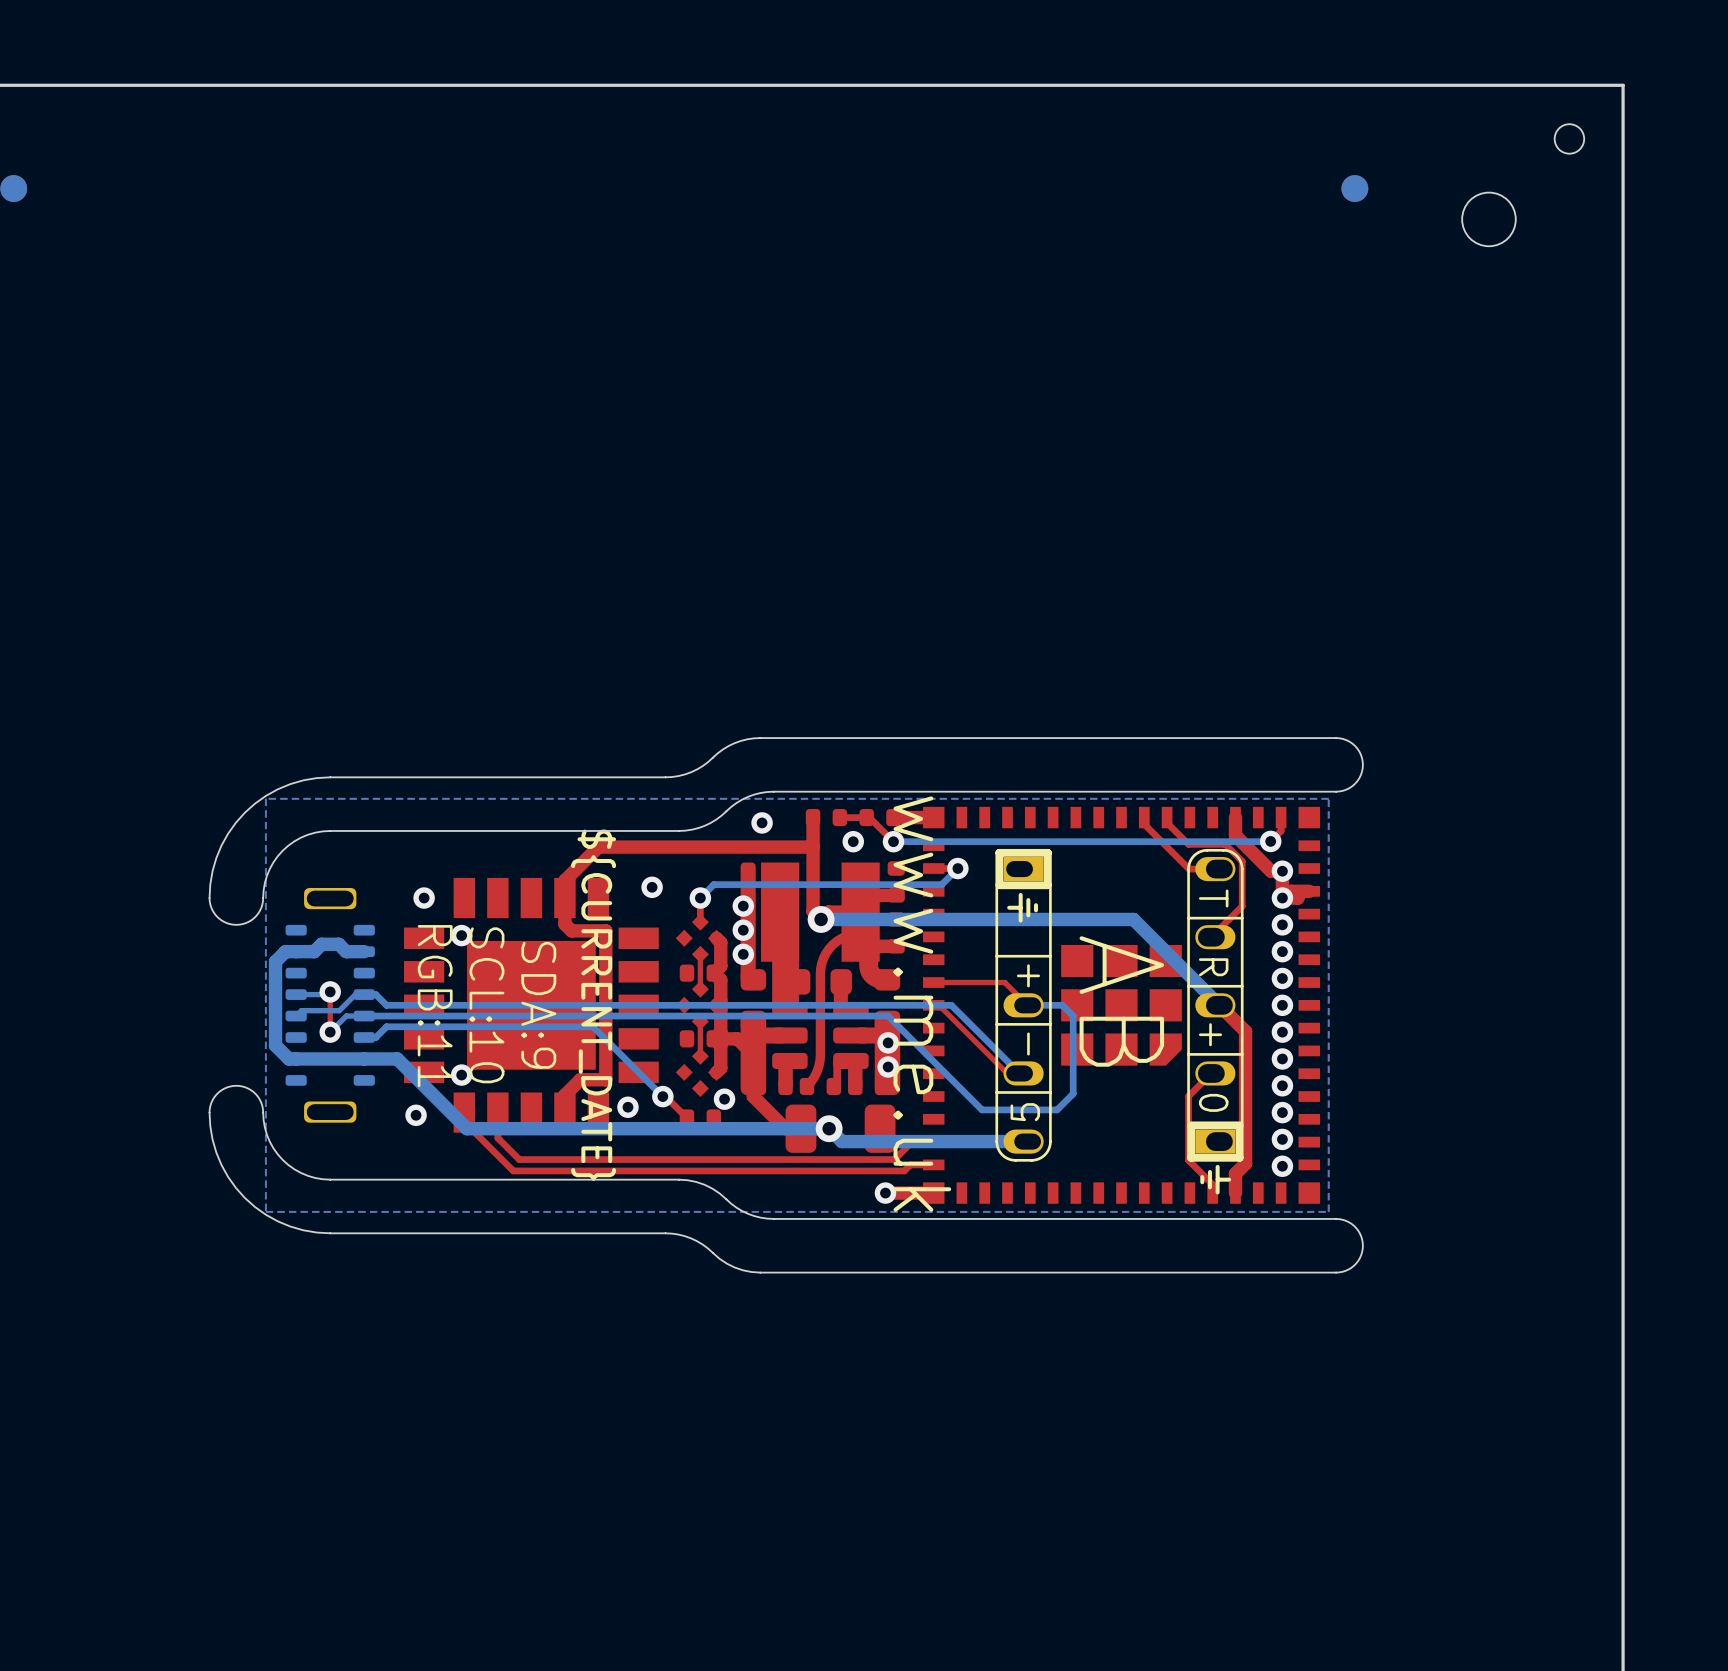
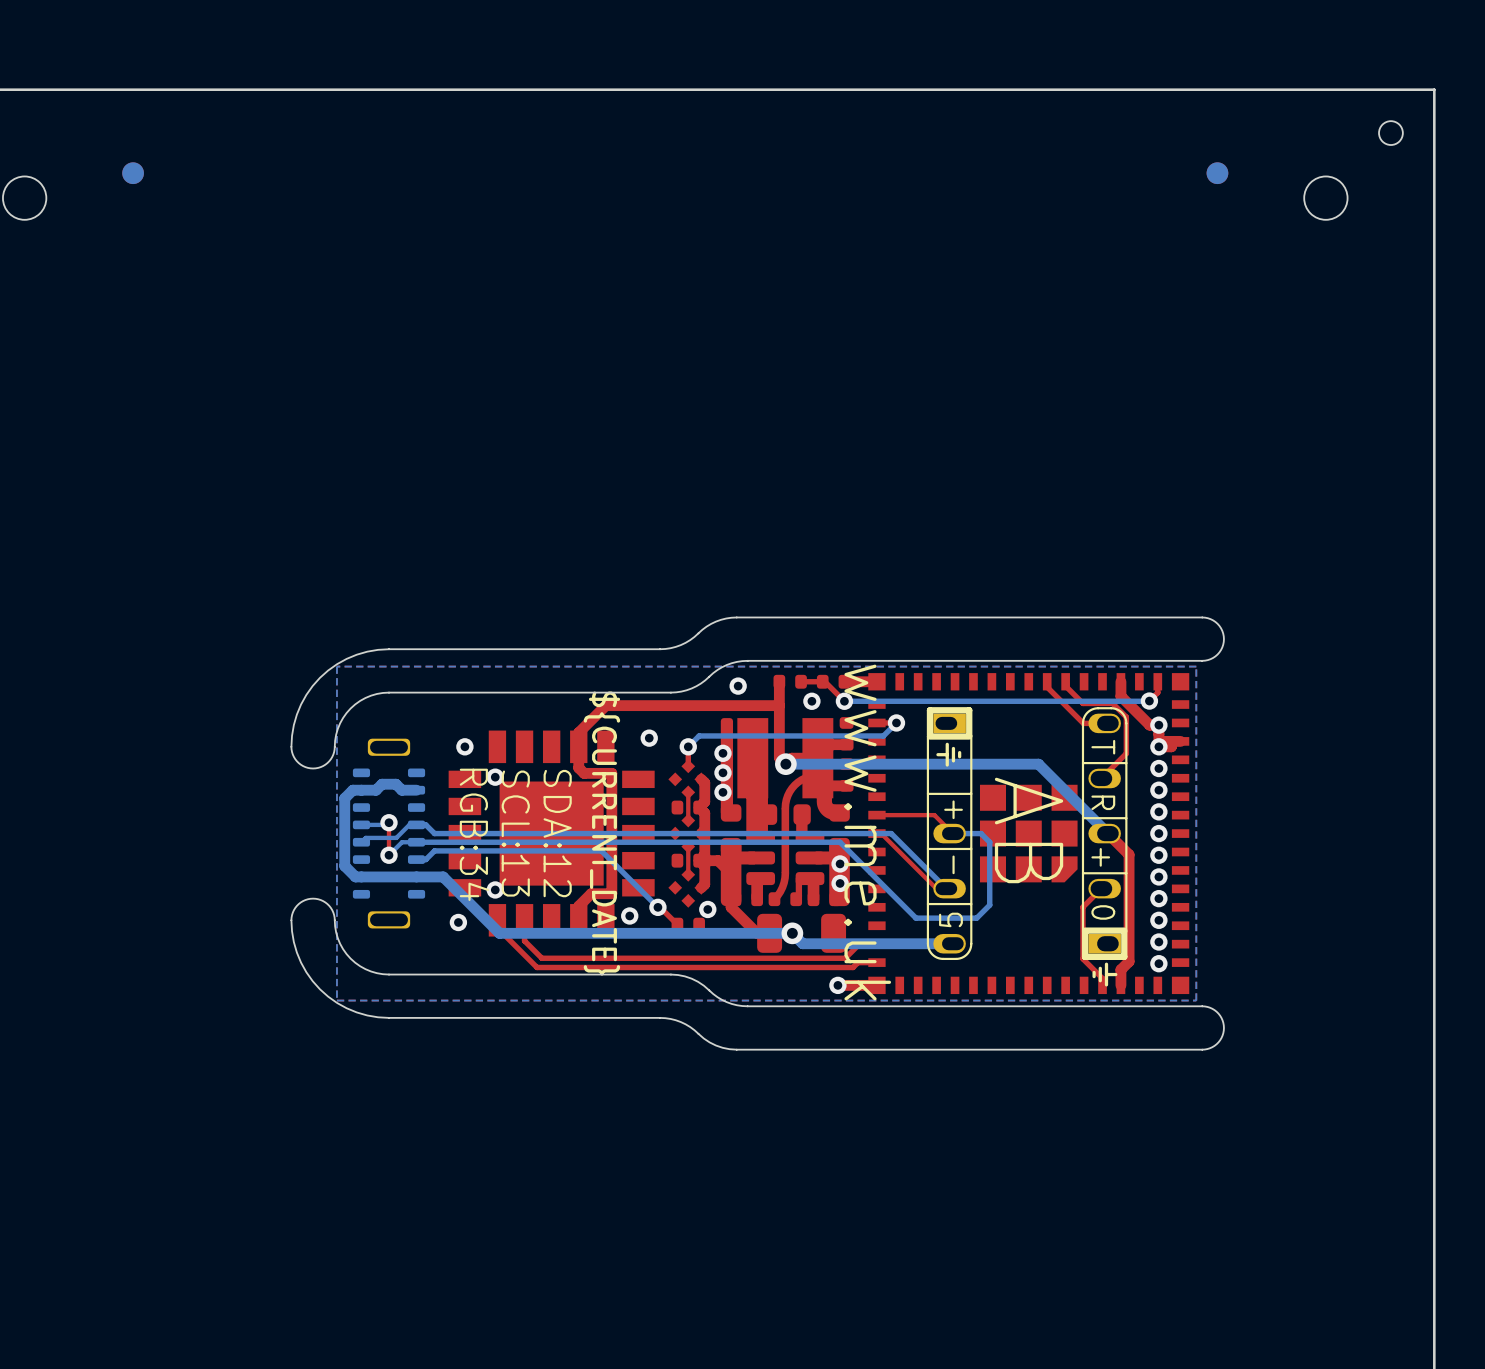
text: SCL:10 (487, 1005) -> SCL:13 (515, 833)
text: SDA:9 (538, 1005) -> SDA:12 (557, 833)
text: RGB:11 (435, 1006) -> RGB:34 (474, 834)

